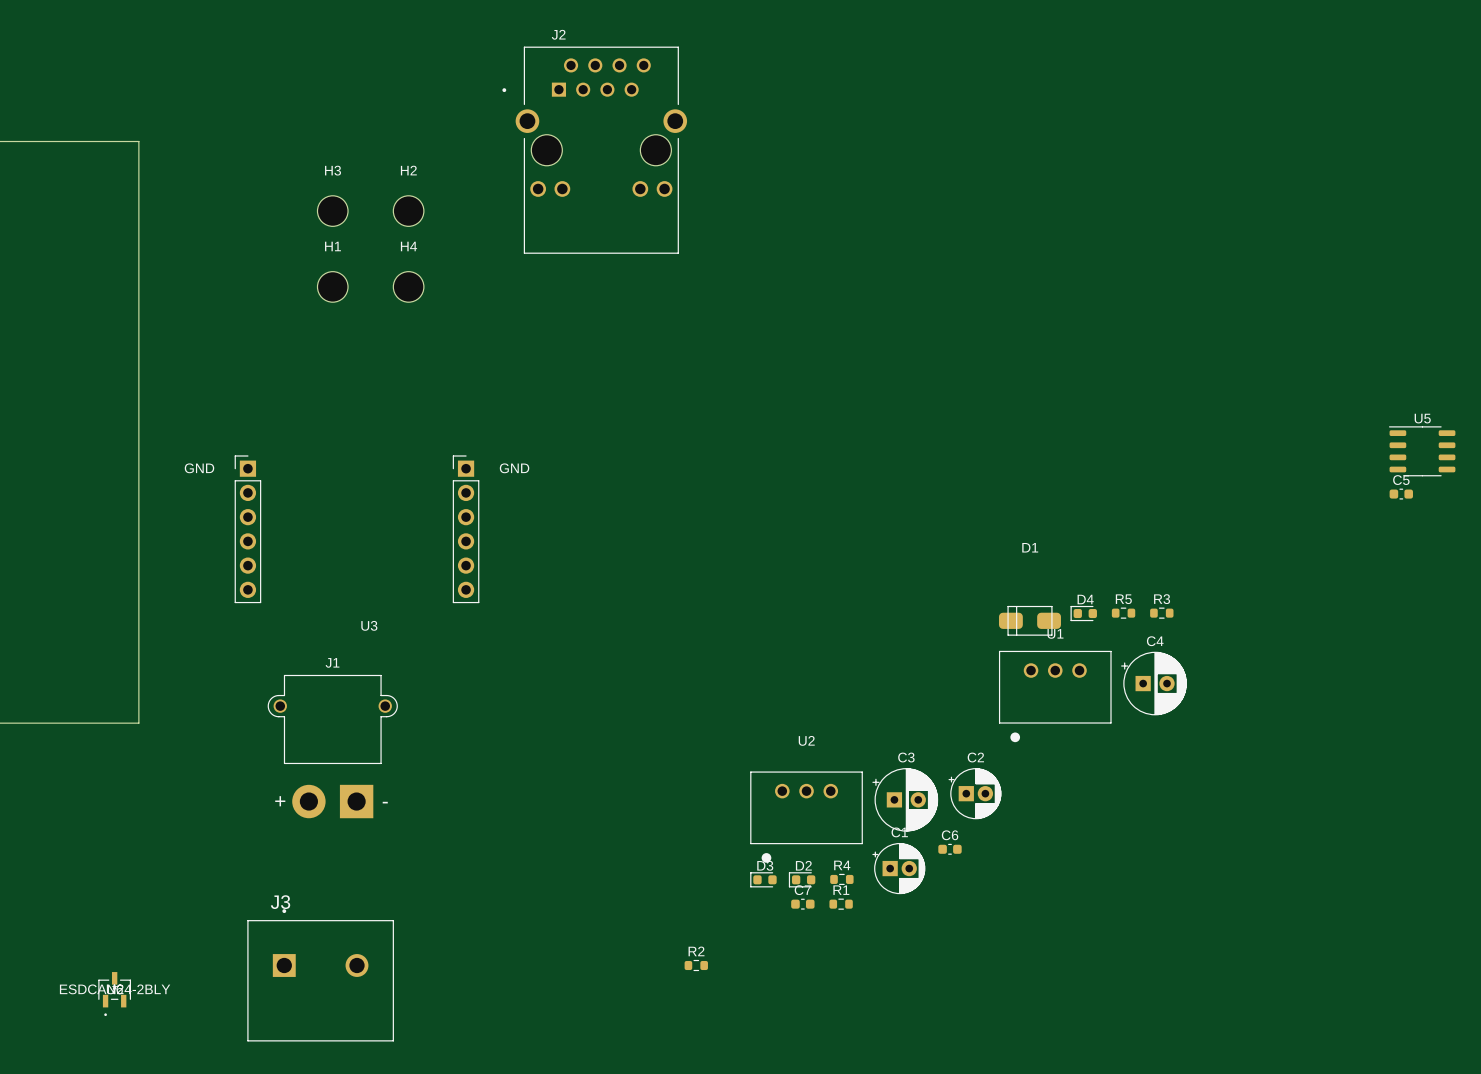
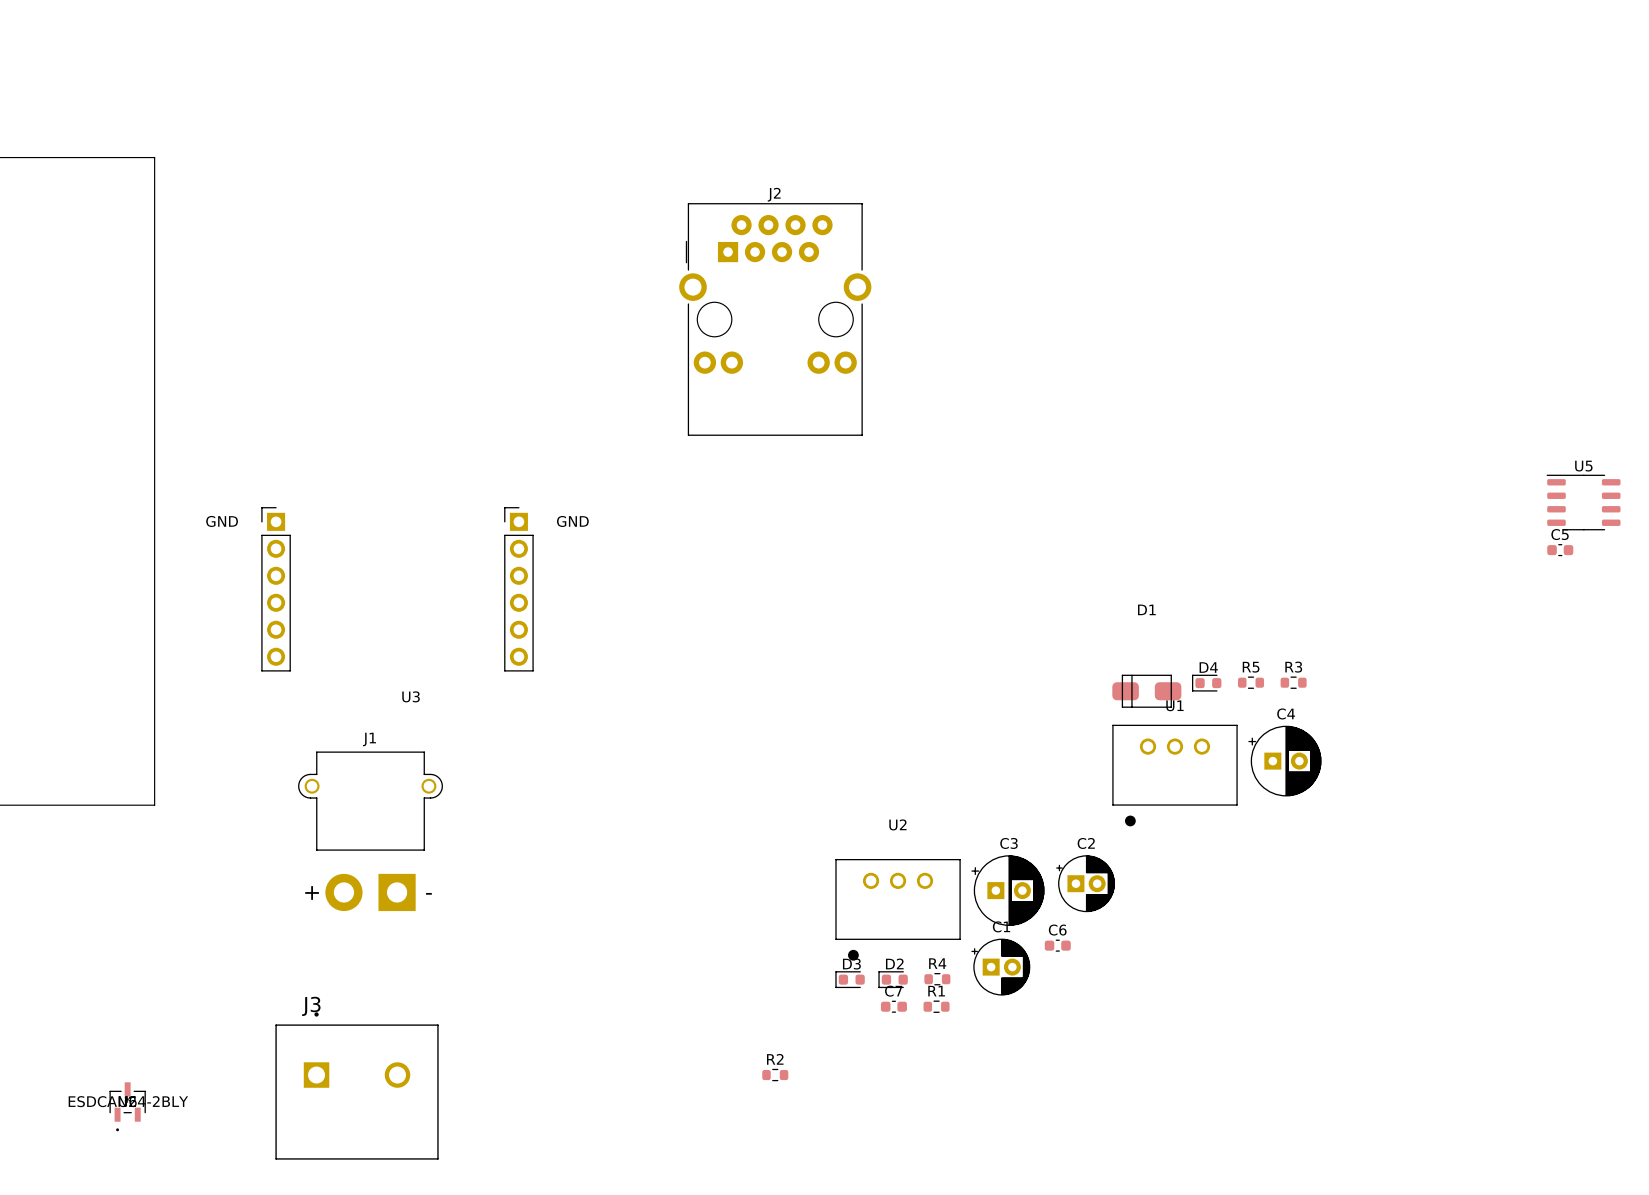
J2 name position: J2 (558, 34) -> J2 (774, 194)
J2 footprint: [502, 46, 688, 254] -> [679, 203, 872, 436]
H3: (332, 211) -> none
H2: (408, 211) -> none
H1: (332, 286) -> none
H4: (408, 286) -> none

